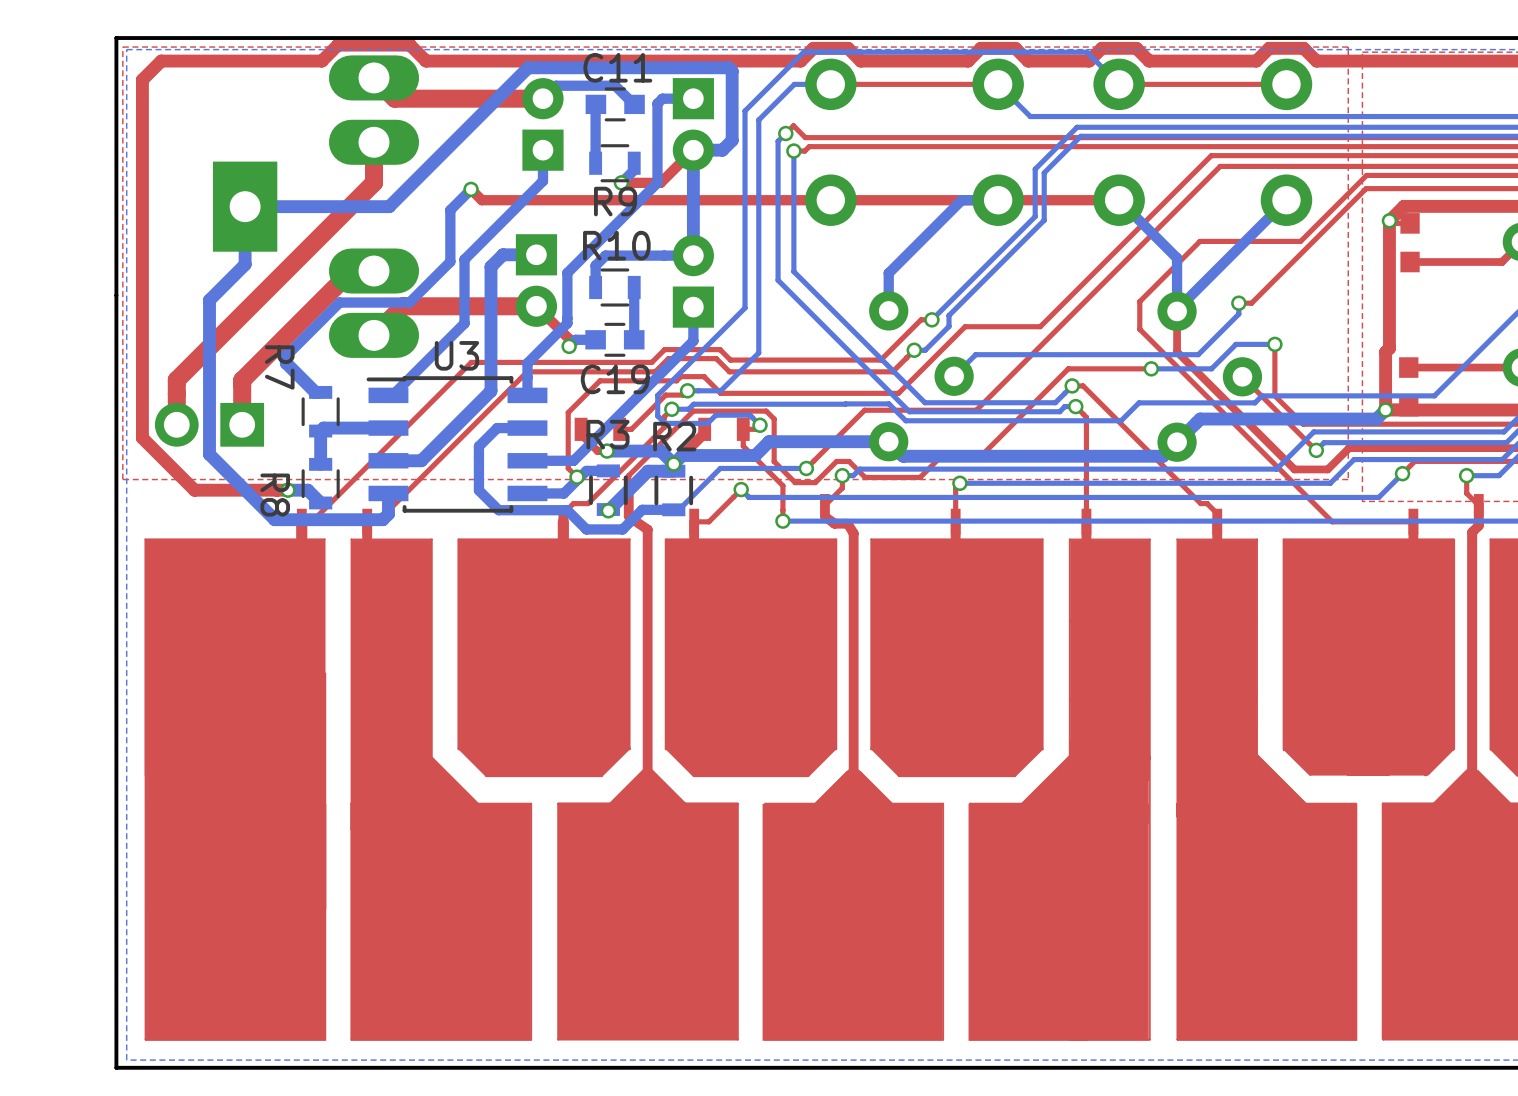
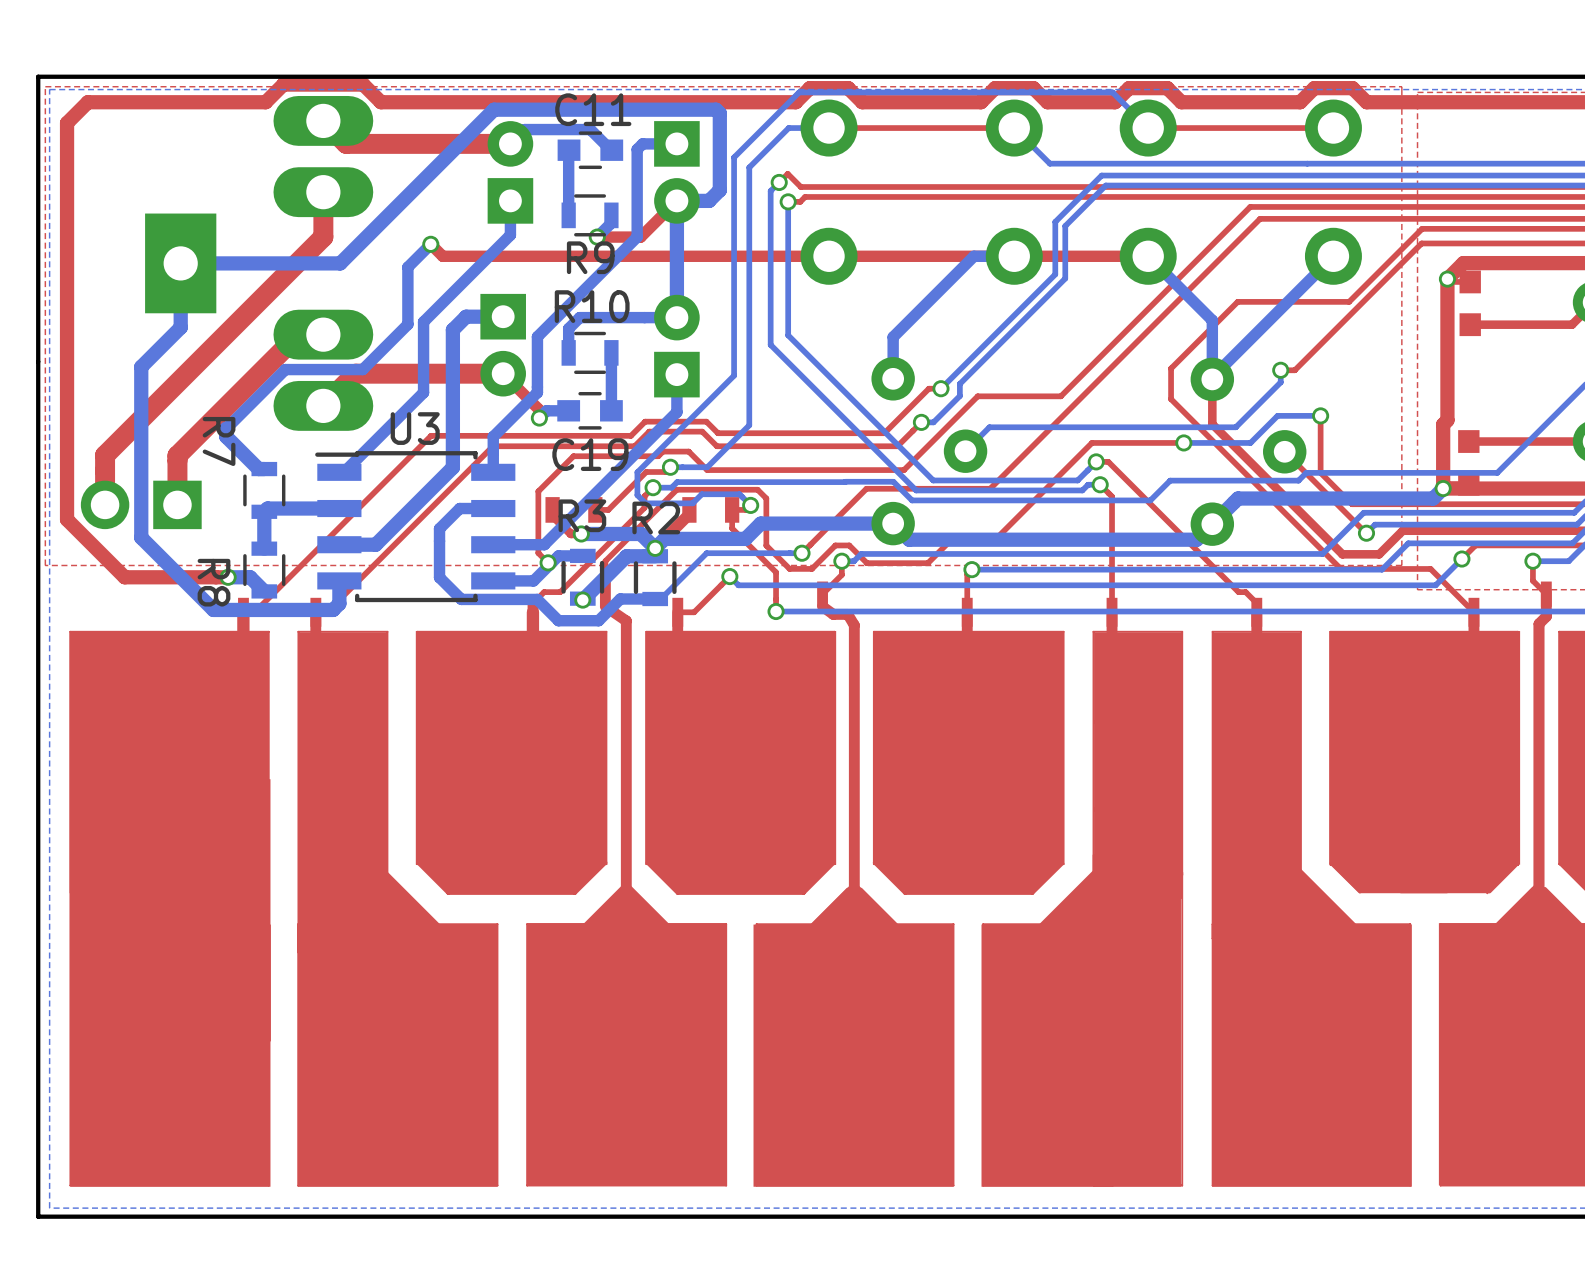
top track: (1293, 482) (1332, 521) (1413, 521) -> (1340, 568) (1430, 568) (1473, 612)

